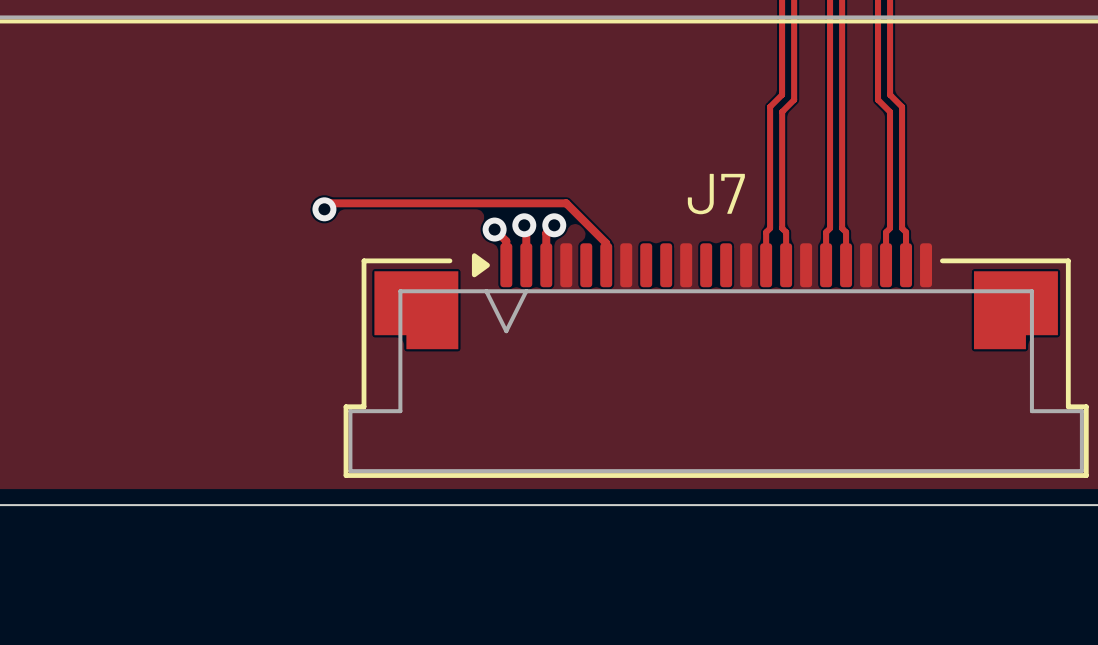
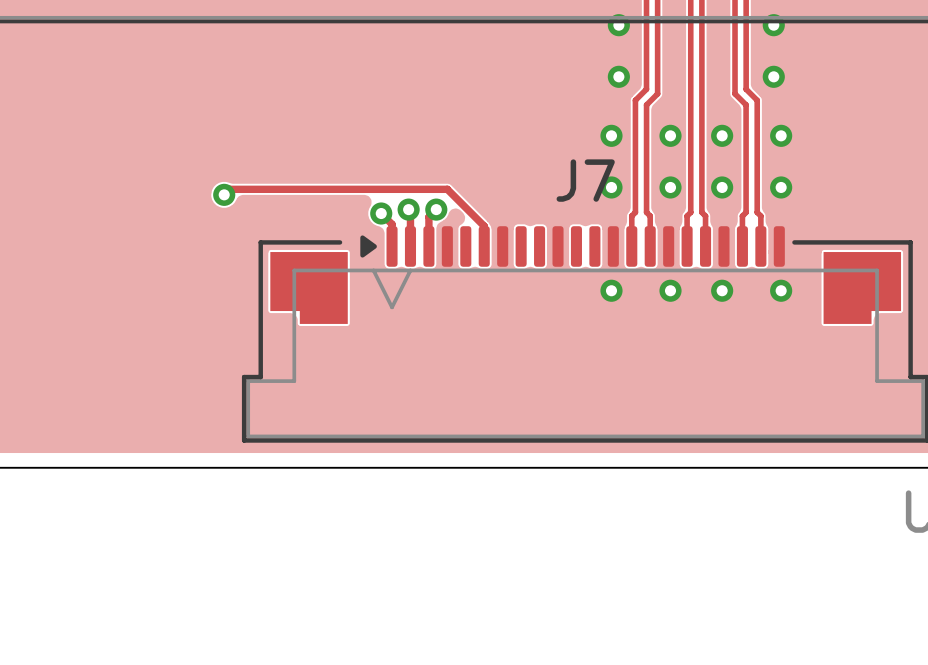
via: none -> (618, 25)
via: none -> (773, 25)
via: none -> (618, 76)
via: none -> (773, 76)
via: none -> (611, 135)
via: none -> (670, 135)
via: none -> (722, 135)
via: none -> (781, 135)
via: none -> (611, 187)
via: none -> (670, 187)
via: none -> (722, 187)
via: none -> (781, 187)
via: none -> (611, 290)
via: none -> (670, 290)
via: none -> (722, 290)
via: none -> (781, 290)

